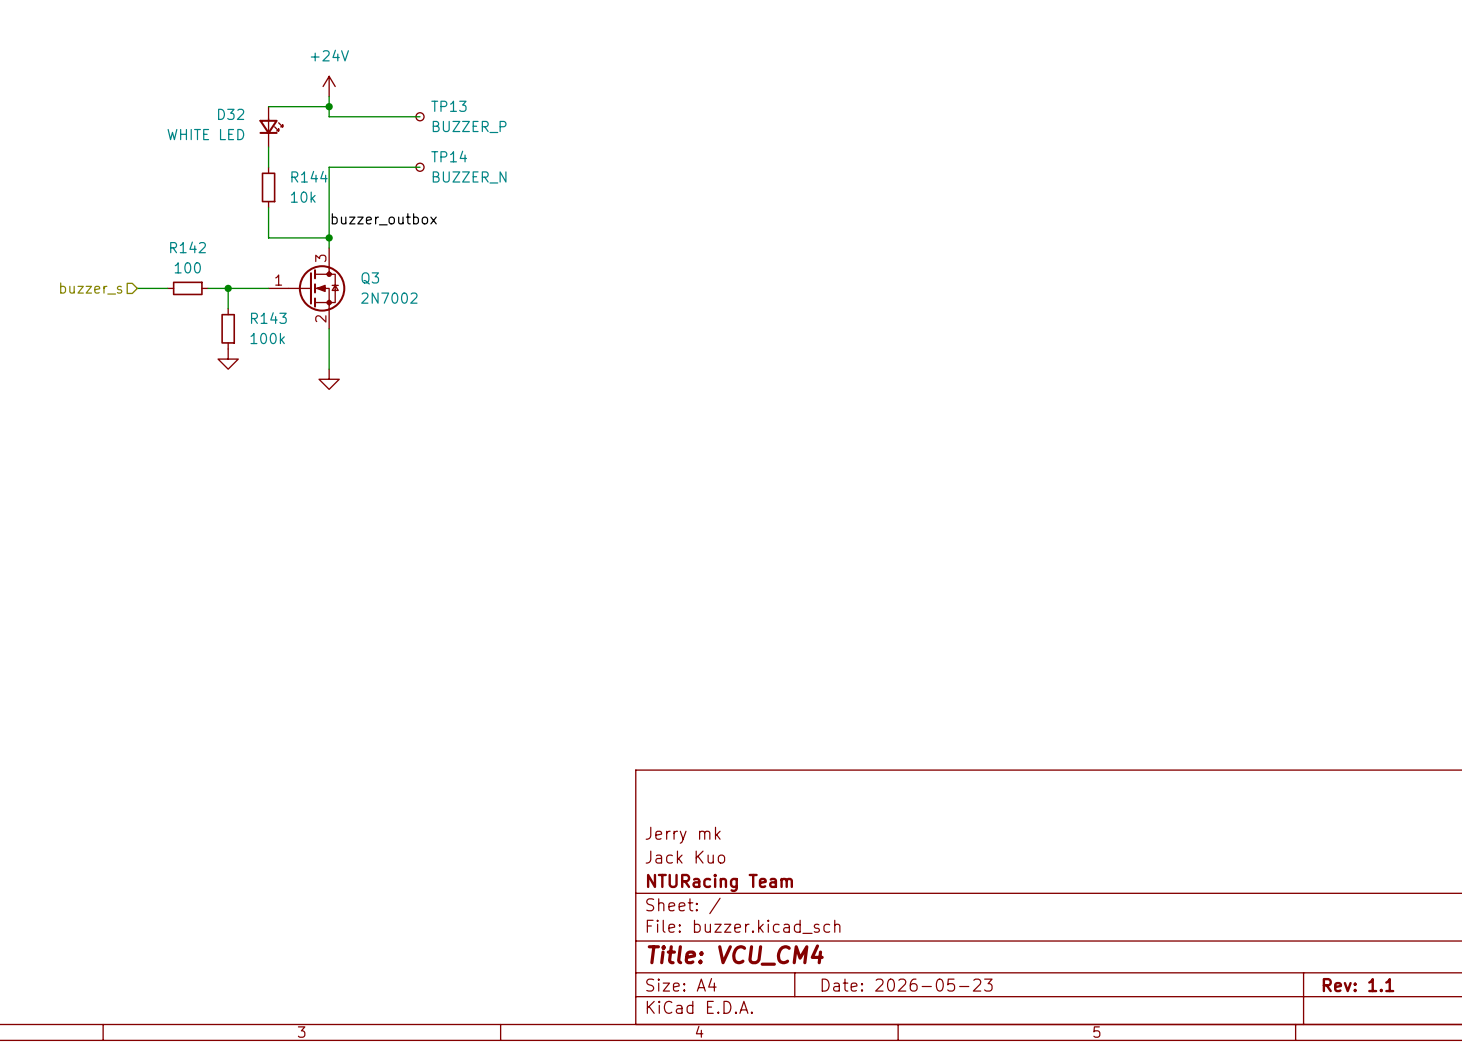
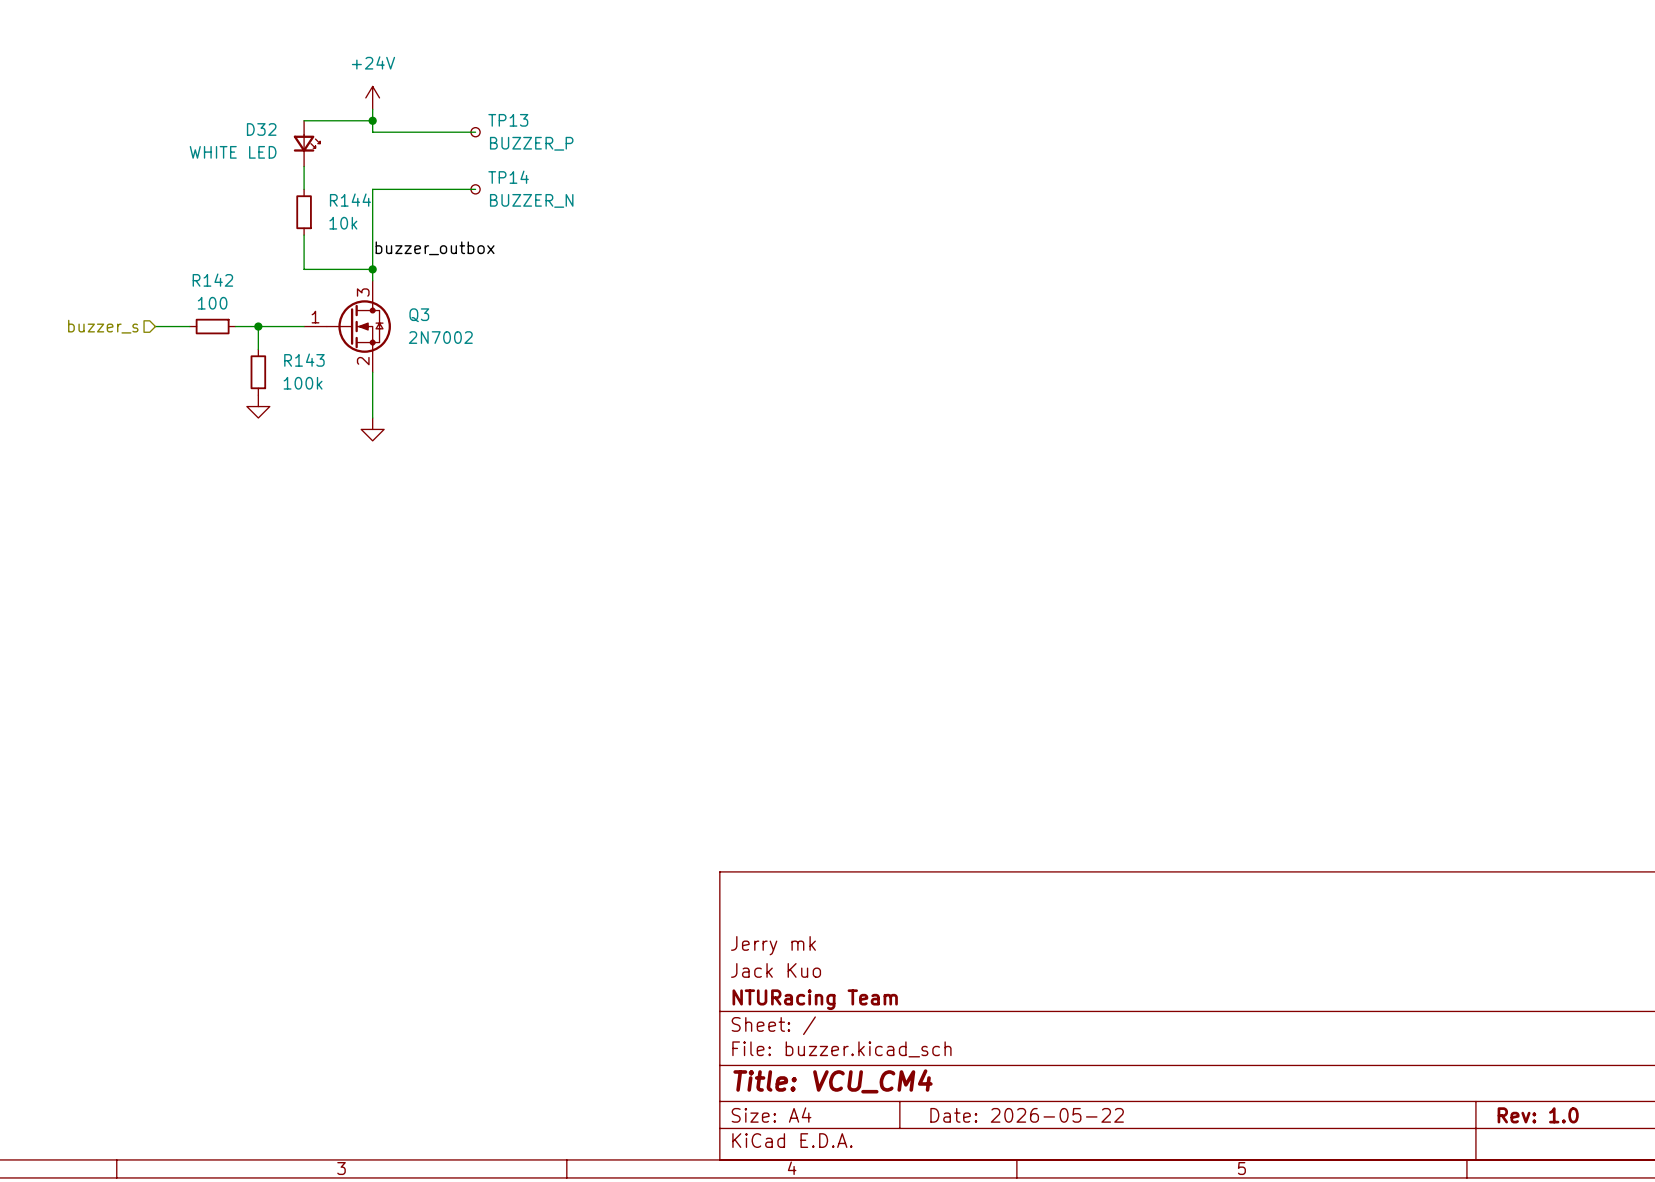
title block: Date: 2026-05-23 (907, 985) -> Date: 2026-05-22 (1027, 1115)
title block: Rev: 1.1 (1358, 985) -> Rev: 1.0 (1538, 1115)

